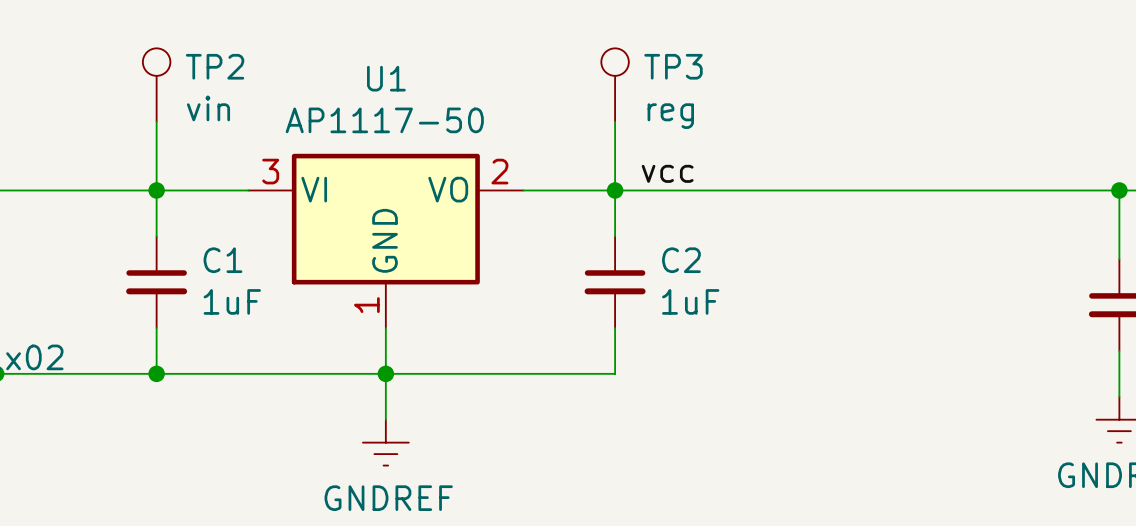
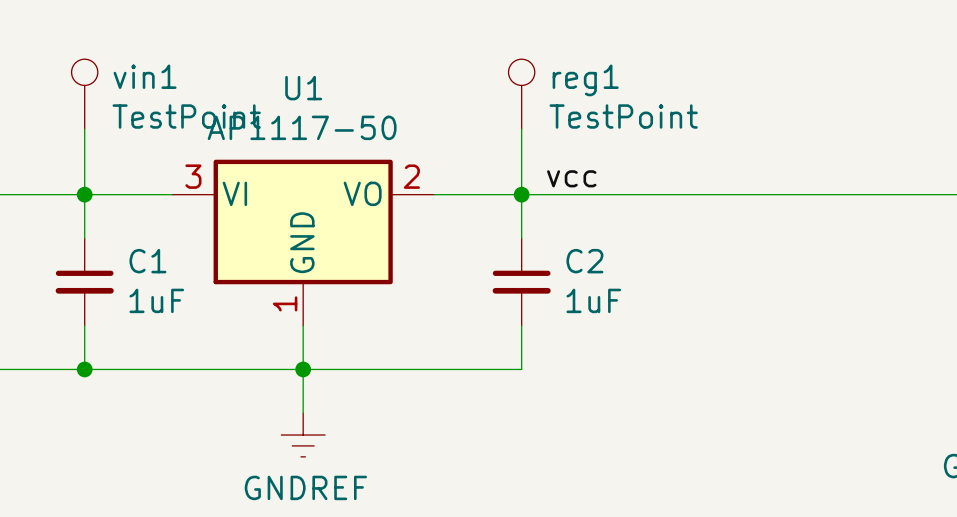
TP2 name: TP2 (215, 66) -> vin1 (145, 76)
TP3 name: TP3 (673, 66) -> reg1 (585, 80)
TP2 value: vin (208, 108) -> TestPoint (186, 116)
TP3 value: reg (670, 116) -> TestPoint (623, 116)

